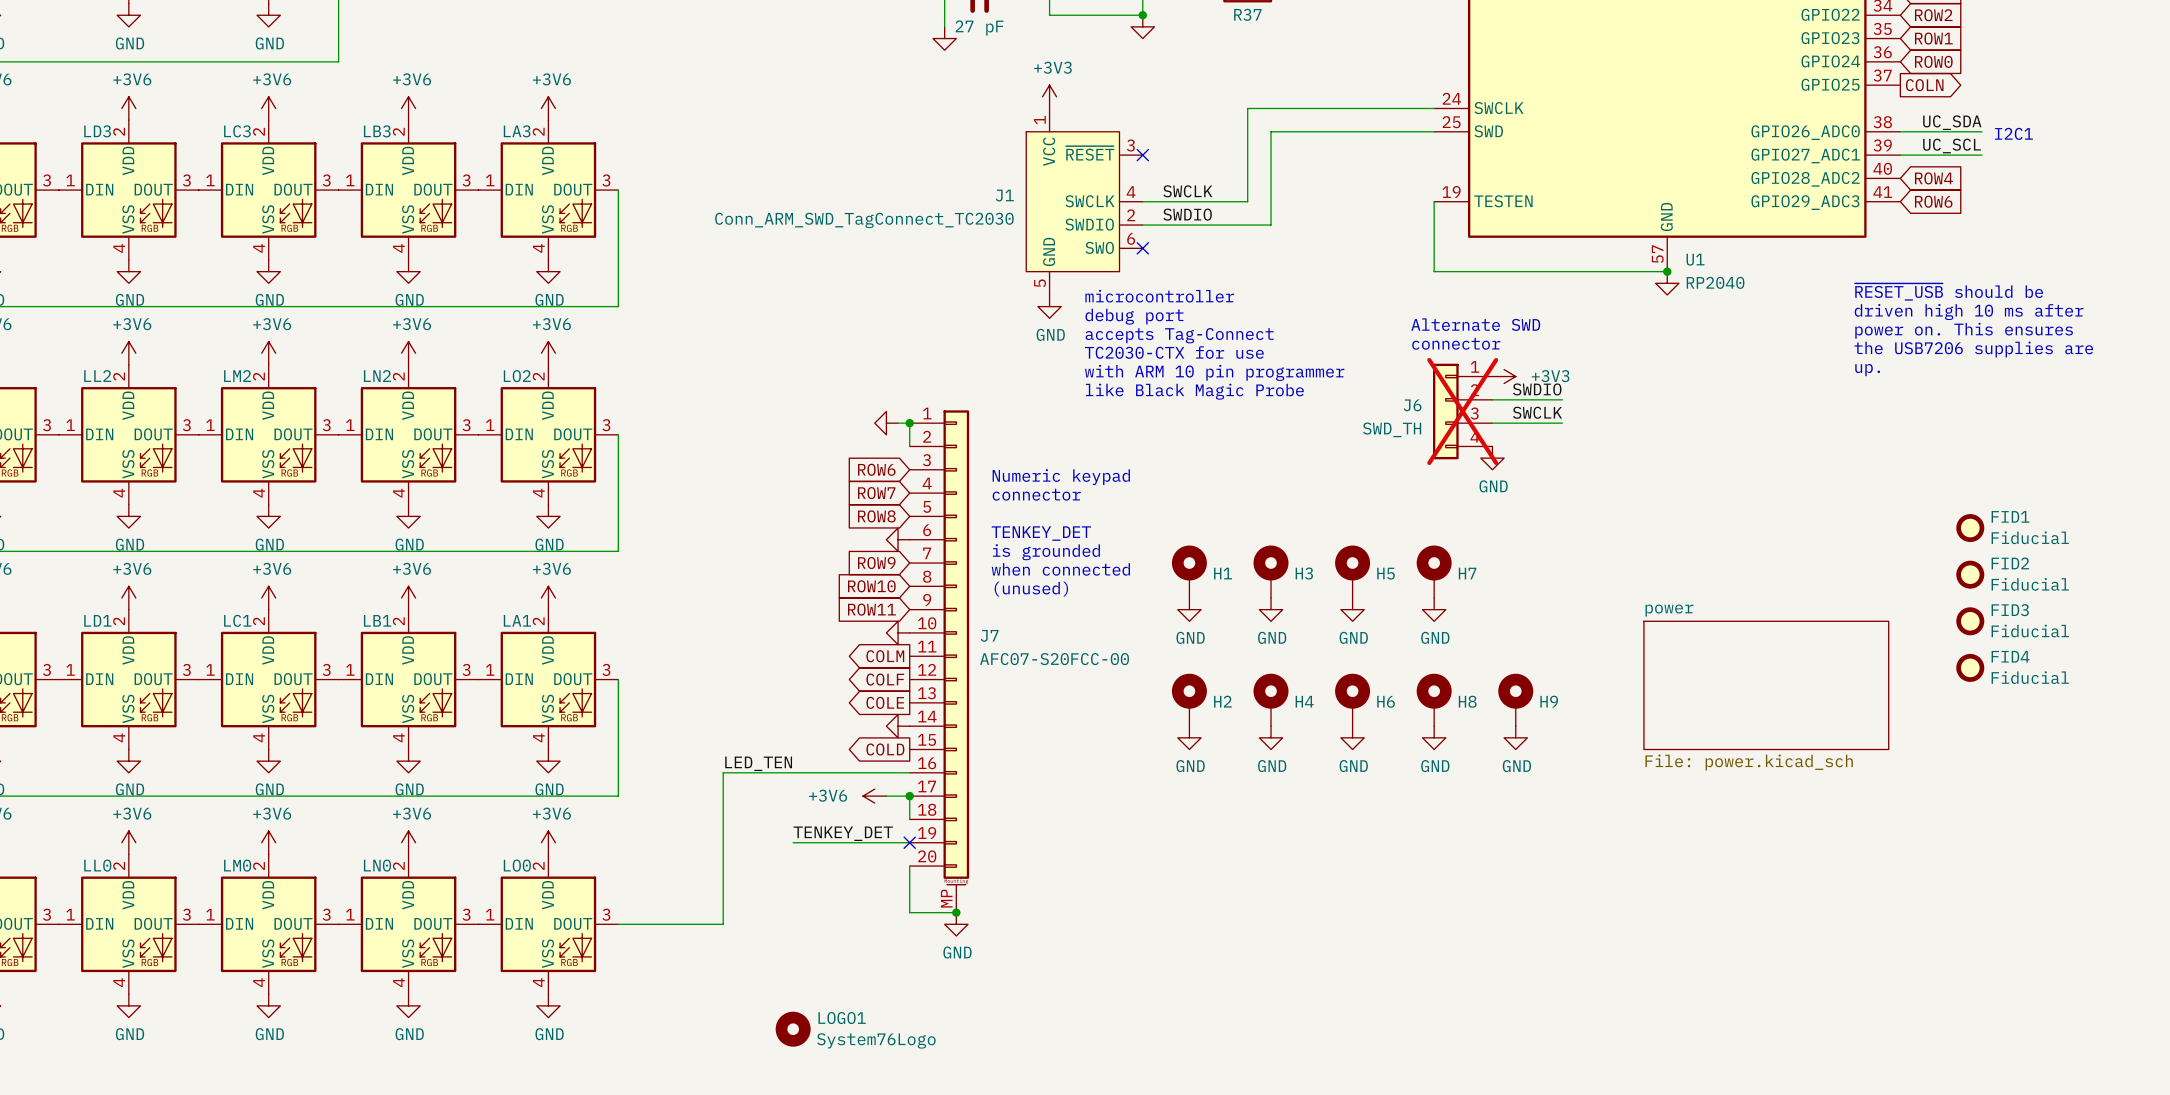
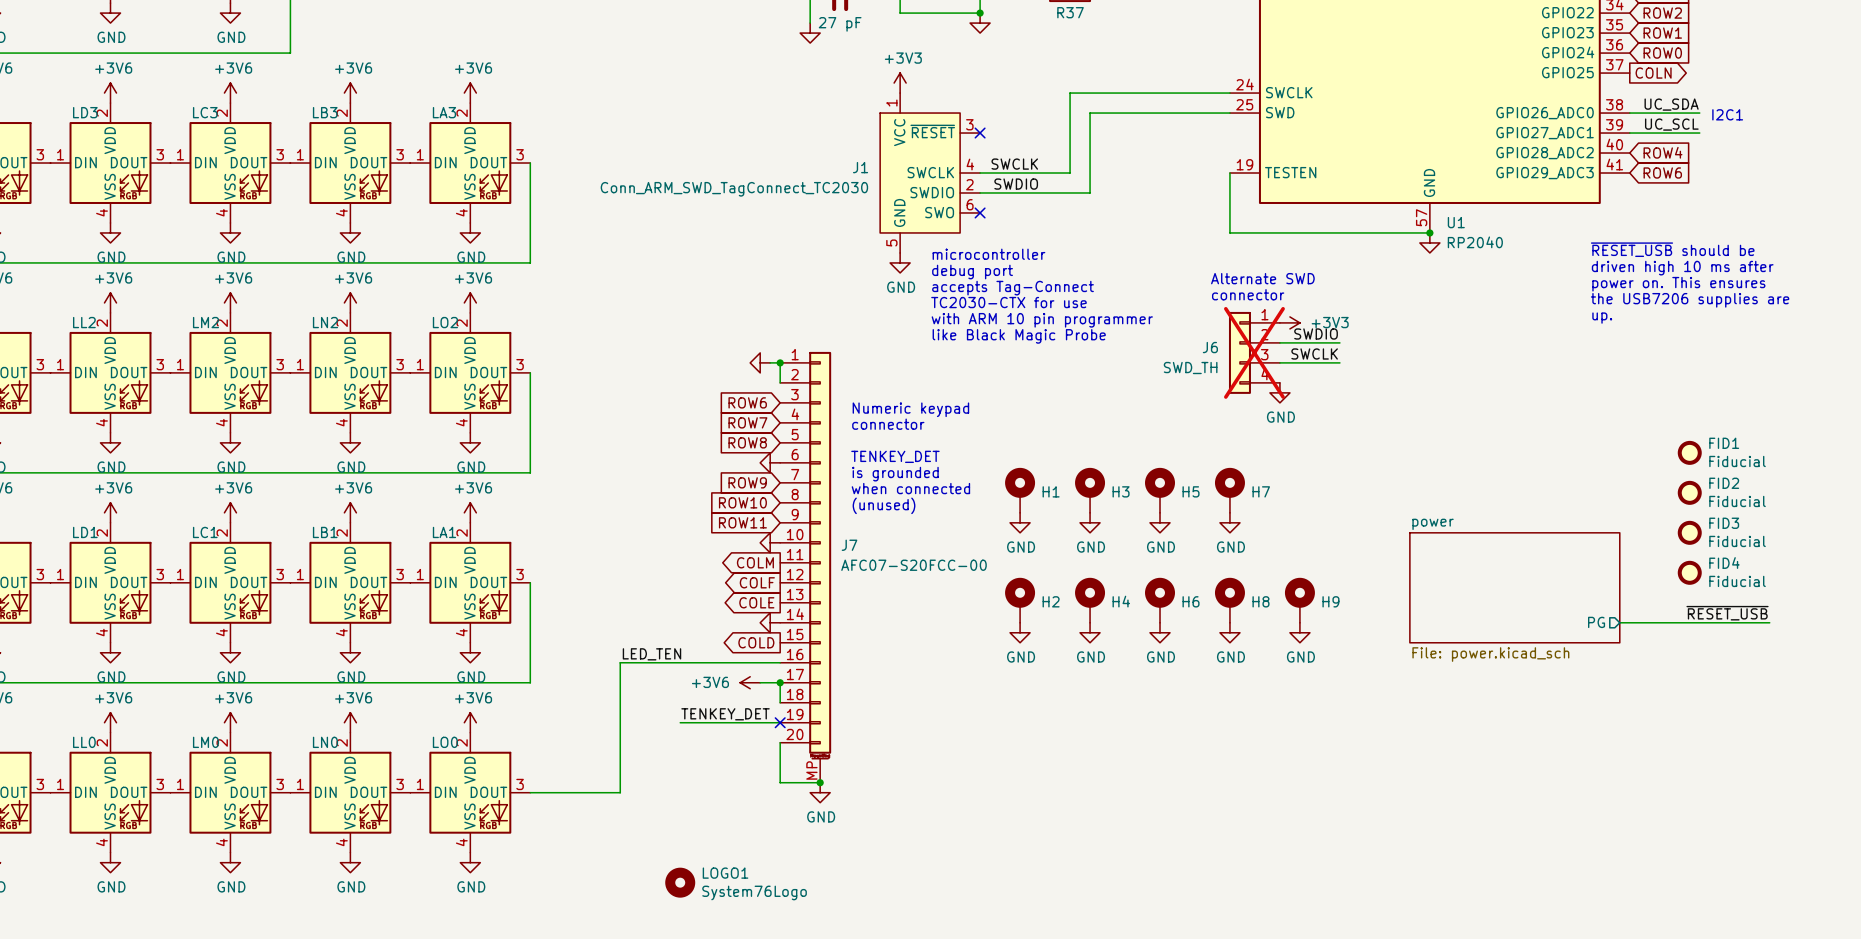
label: none -> ~{RESET_USB} (1727, 613)
sheet pin: none -> PG (1596, 622)
wire: none -> (1619, 622) (1769, 622)

